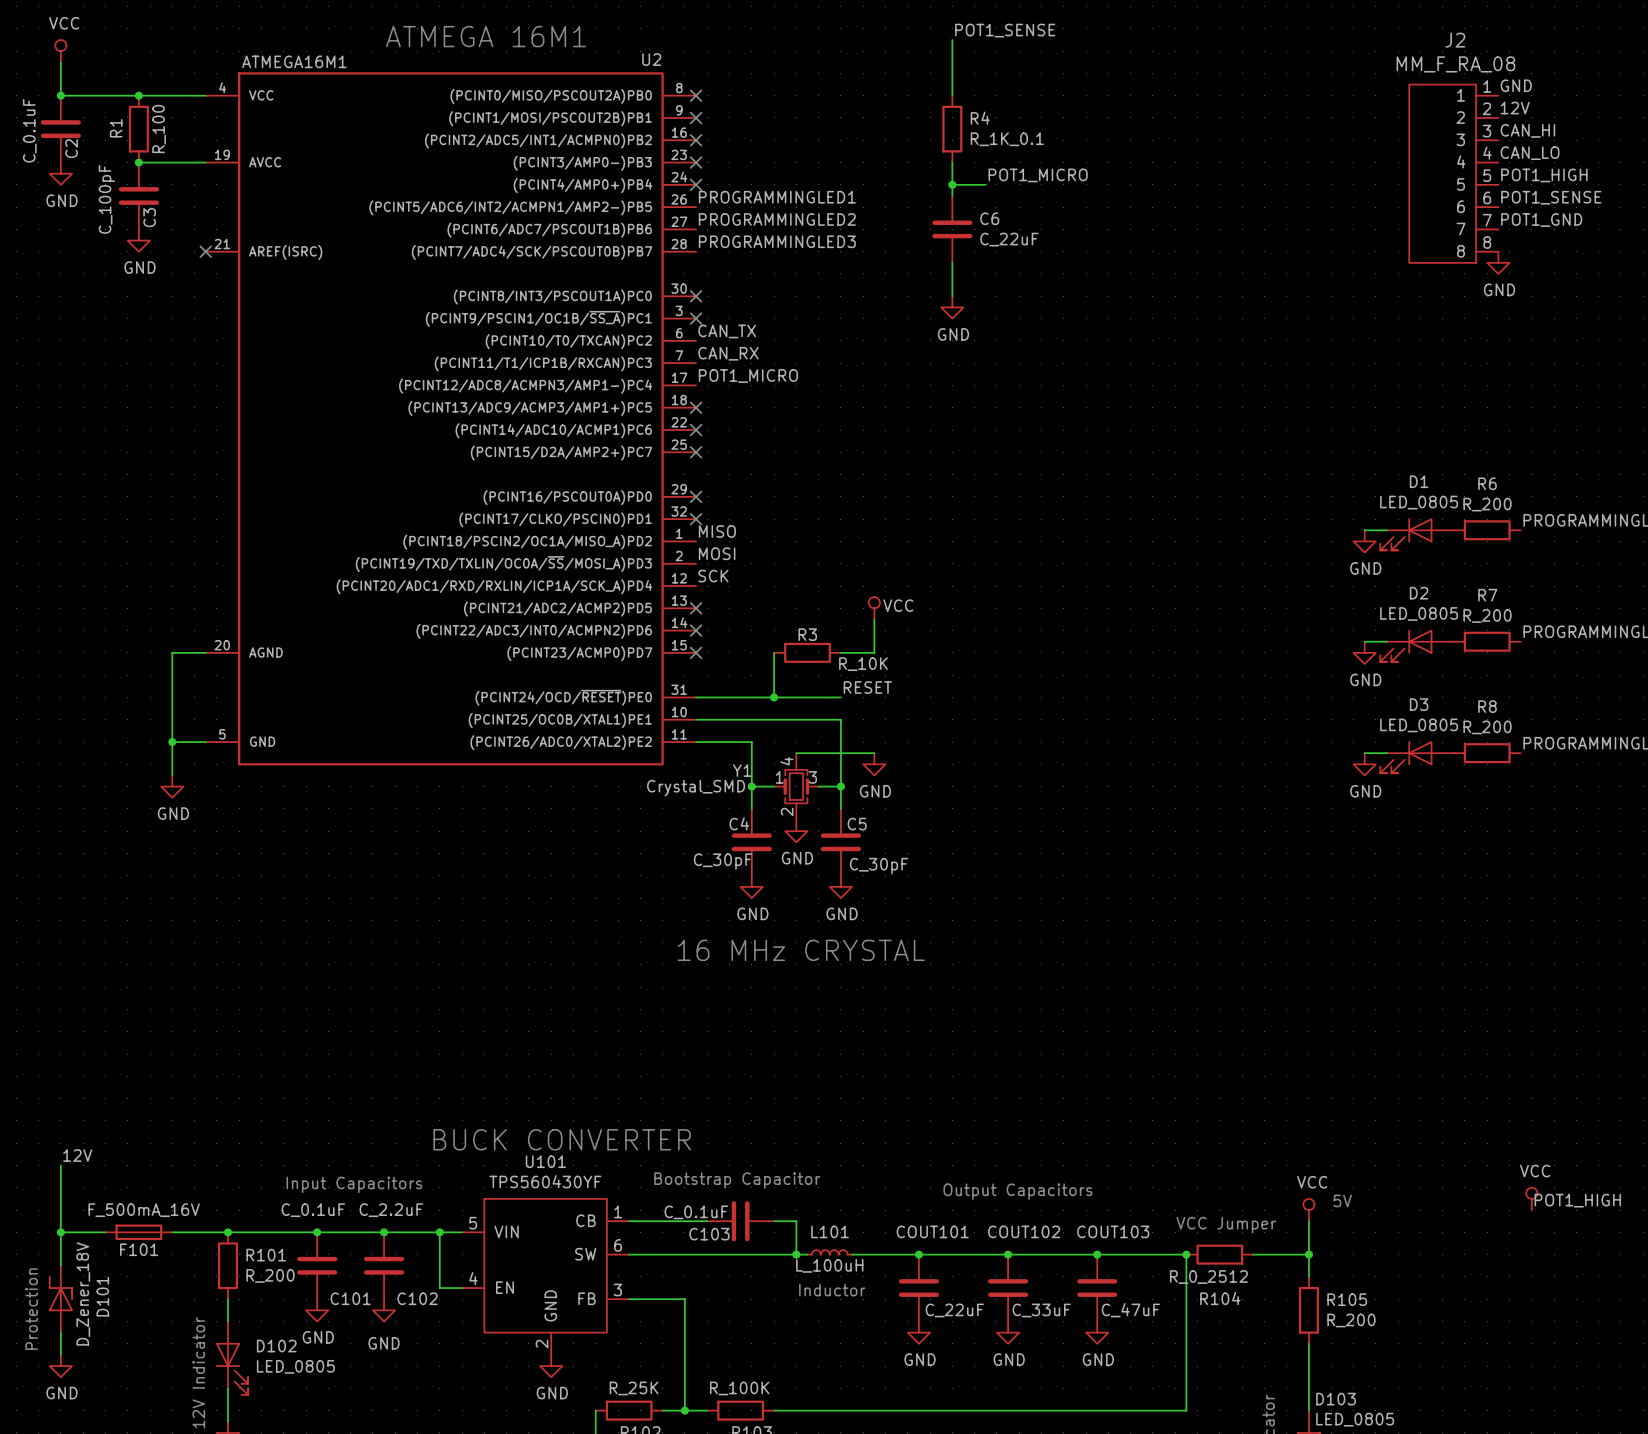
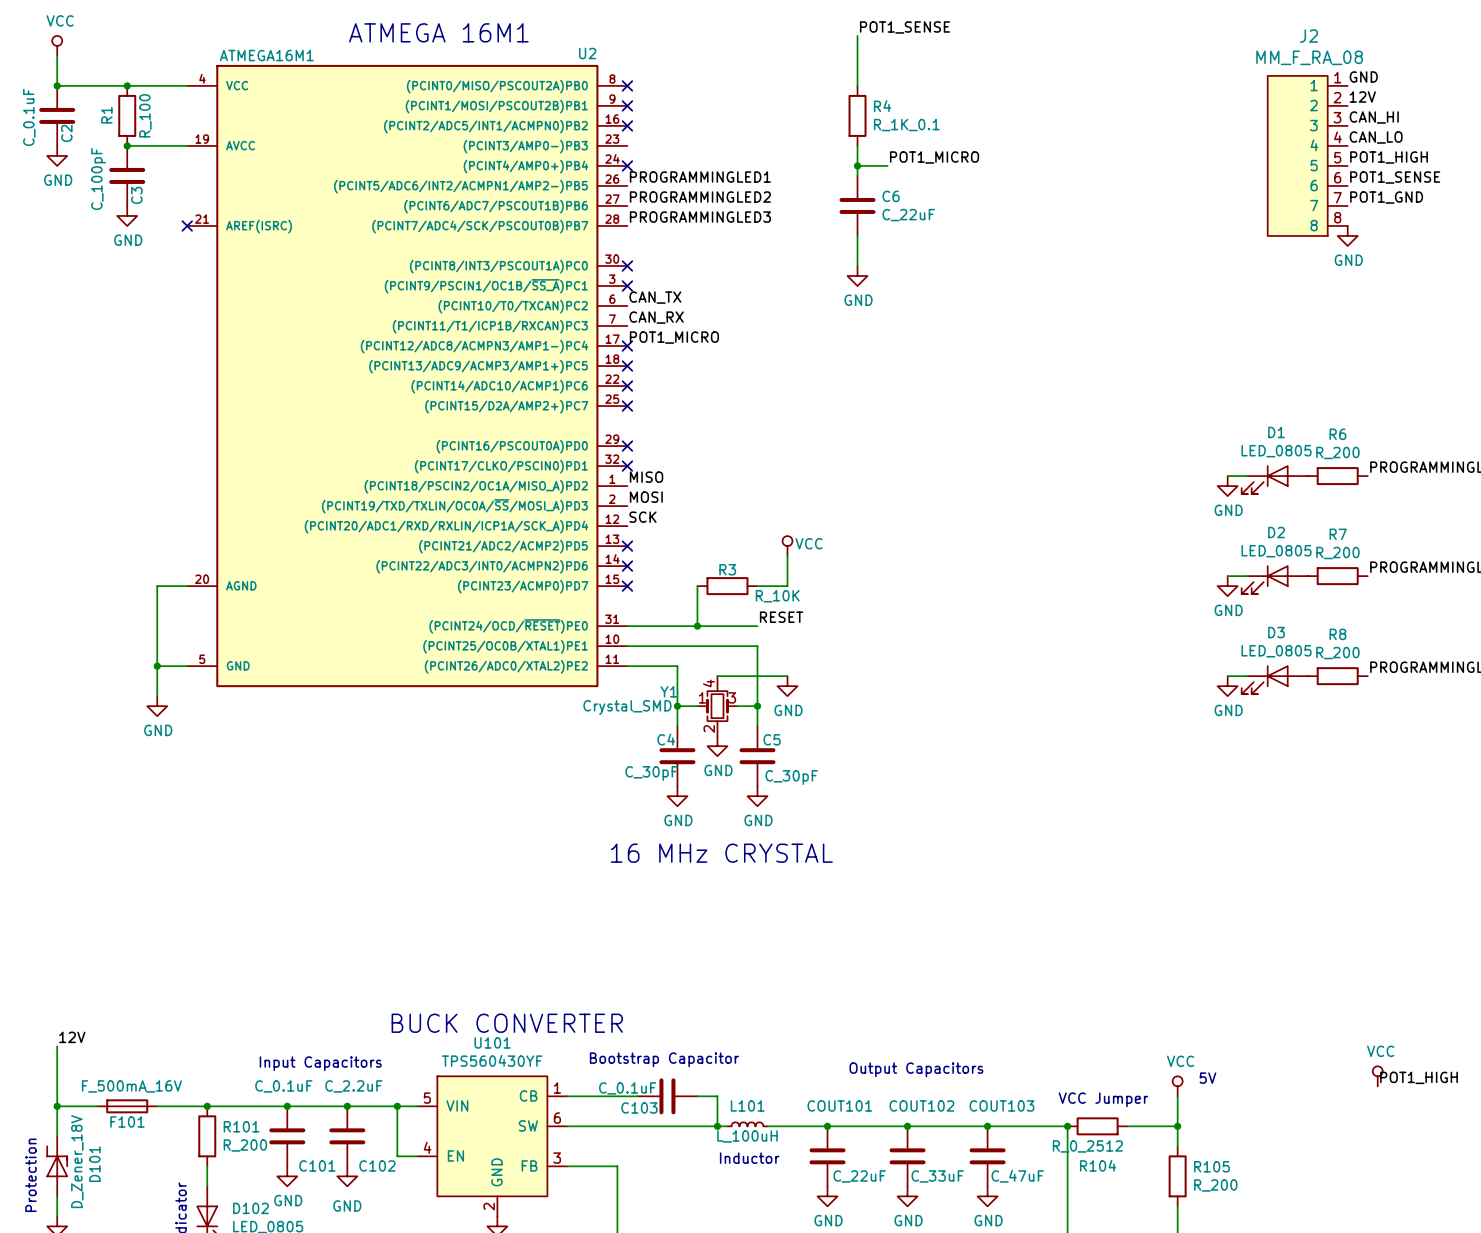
no-connect mark: (696, 162) -> none
no-connect mark: none -> (627, 346)

